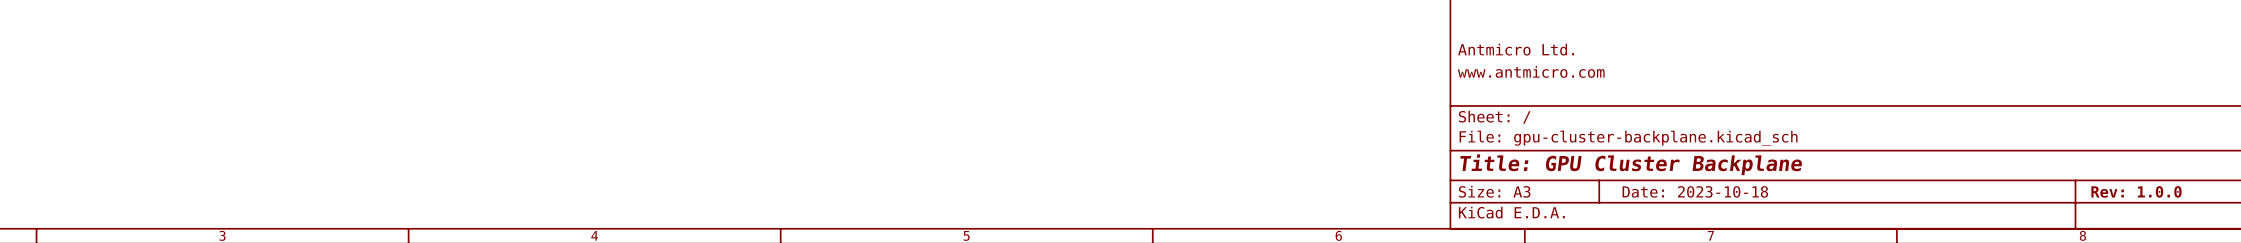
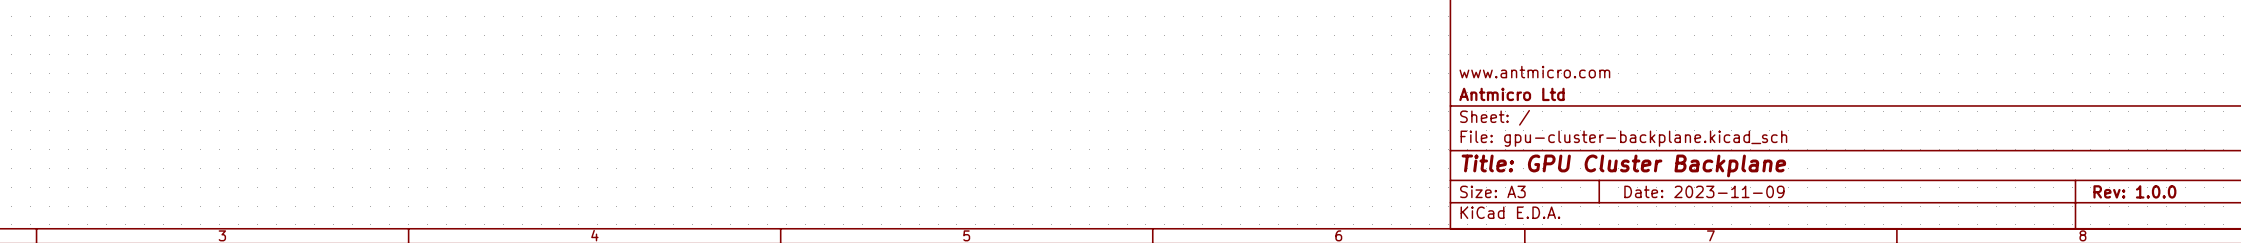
title block: Antmicro Ltd. (1516, 49) -> none
title block: none -> Antmicro Ltd (1511, 94)
title block: Date: 2023-10-18 (1695, 191) -> Date: 2023-11-09 (1704, 191)

